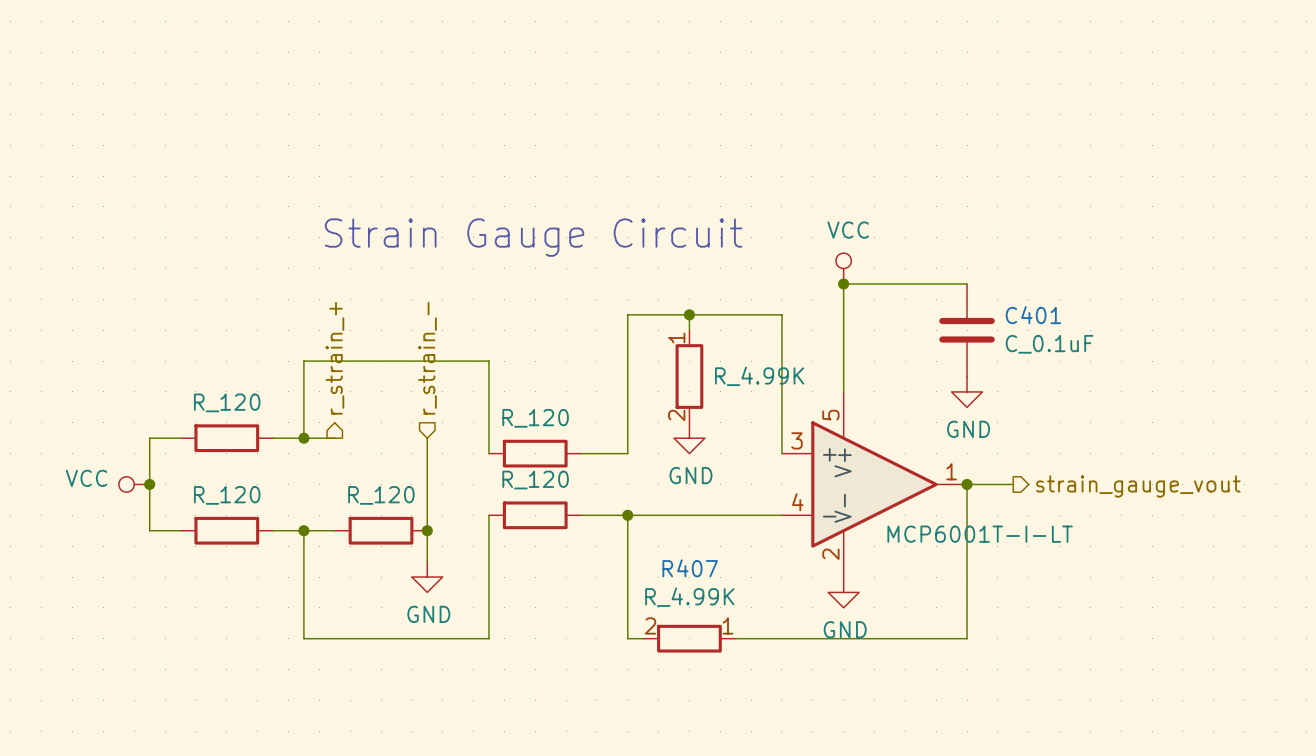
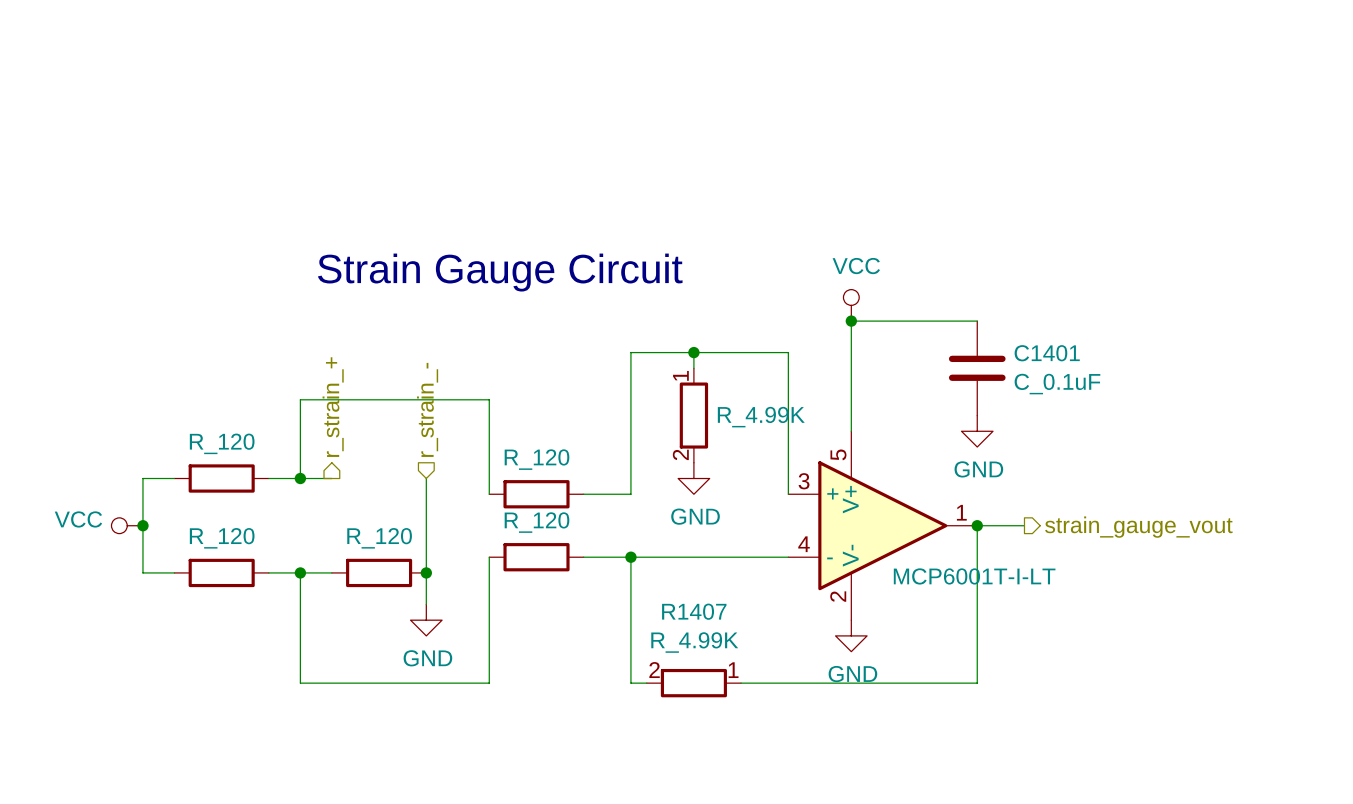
C401 name: C401 (1033, 315) -> C1401 (1047, 353)
R407 name: R407 (690, 568) -> R1407 (694, 611)

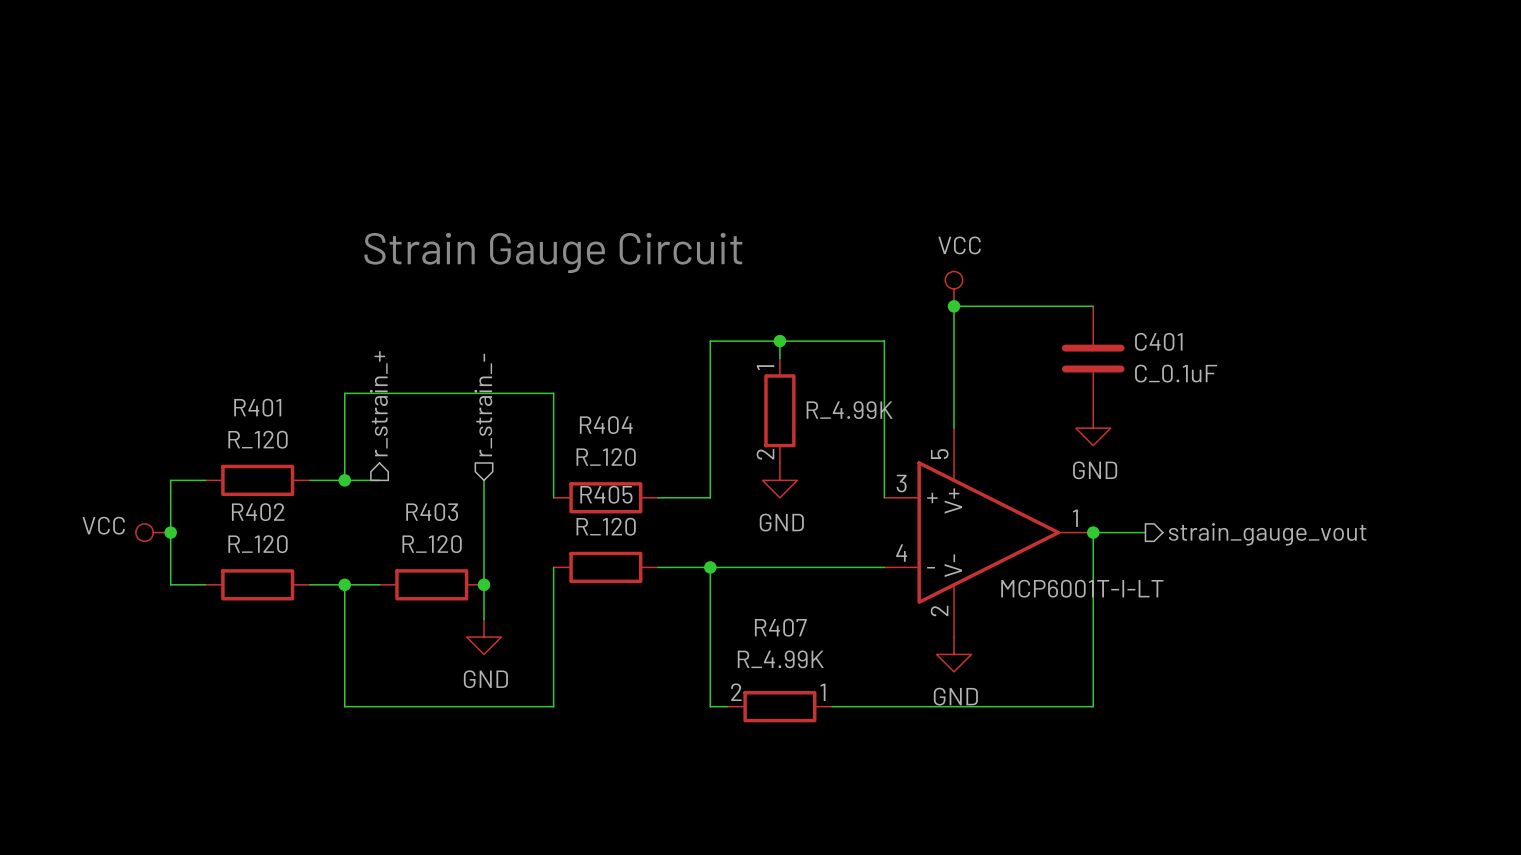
C1401 name: C1401 (1047, 353) -> C401 (1158, 341)
R401 name: none -> R401 (257, 407)
R404 name: none -> R404 (606, 425)
R405 name: none -> R405 (606, 494)
R402 name: none -> R402 (258, 512)
R403 name: none -> R403 (432, 512)
R1407 name: R1407 (694, 611) -> R407 (780, 627)

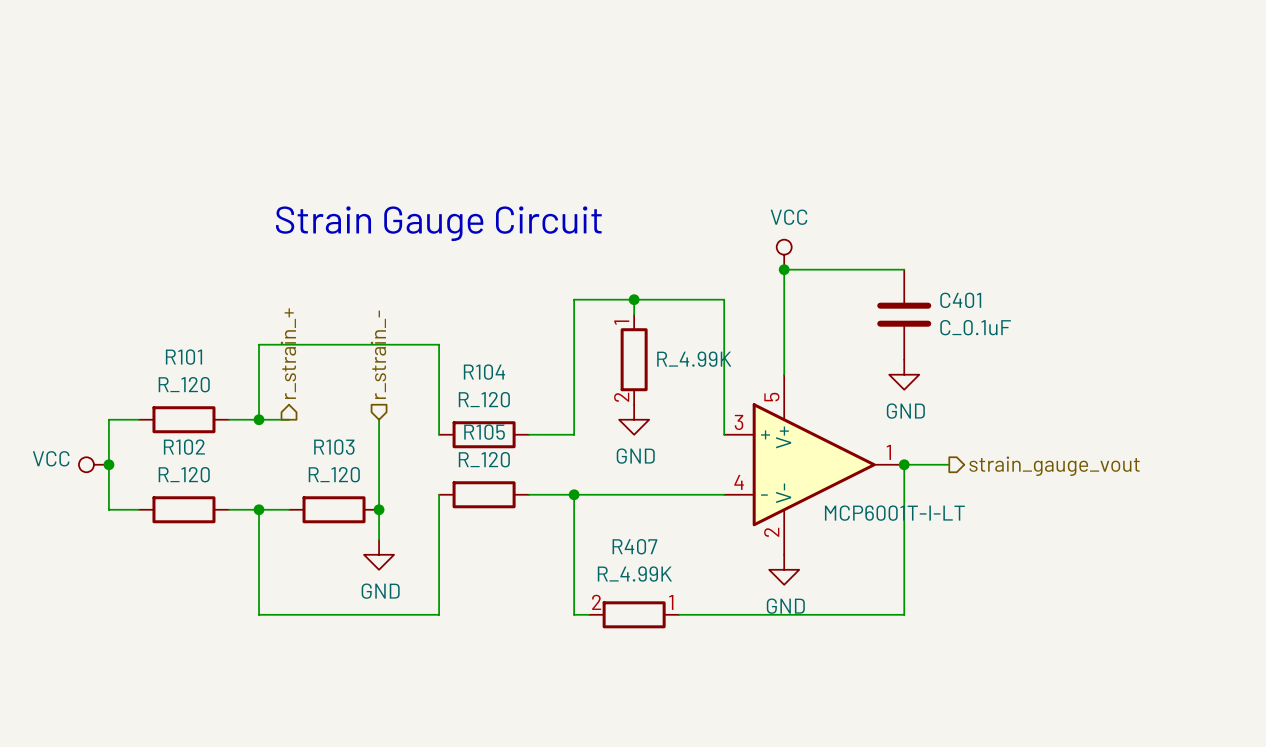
R401 name: R401 (257, 407) -> R101 (183, 357)
R404 name: R404 (606, 425) -> R104 (484, 372)
R405 name: R405 (606, 494) -> R105 (484, 432)
R402 name: R402 (258, 512) -> R102 (184, 447)
R403 name: R403 (432, 512) -> R103 (334, 447)

